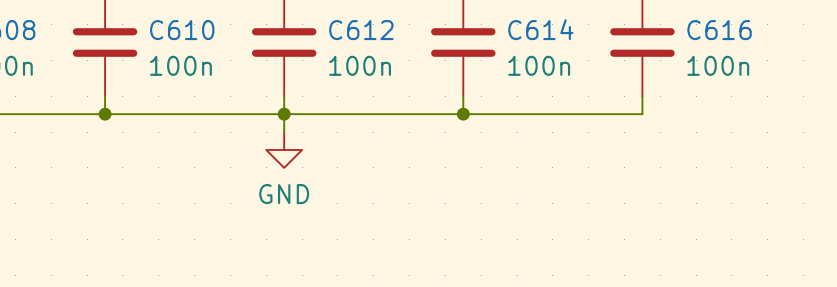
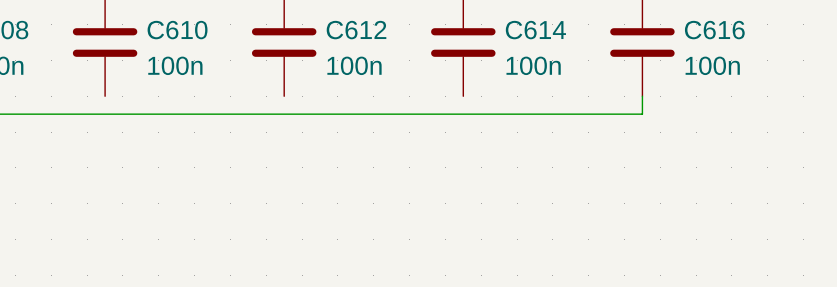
wire: (105, 96) (105, 114) -> none
wire: (284, 96) (284, 132) -> none
wire: (463, 96) (463, 114) -> none
junction: (105, 114) -> none
junction: (284, 114) -> none
junction: (463, 114) -> none
power symbol: GND (284, 149) -> none

